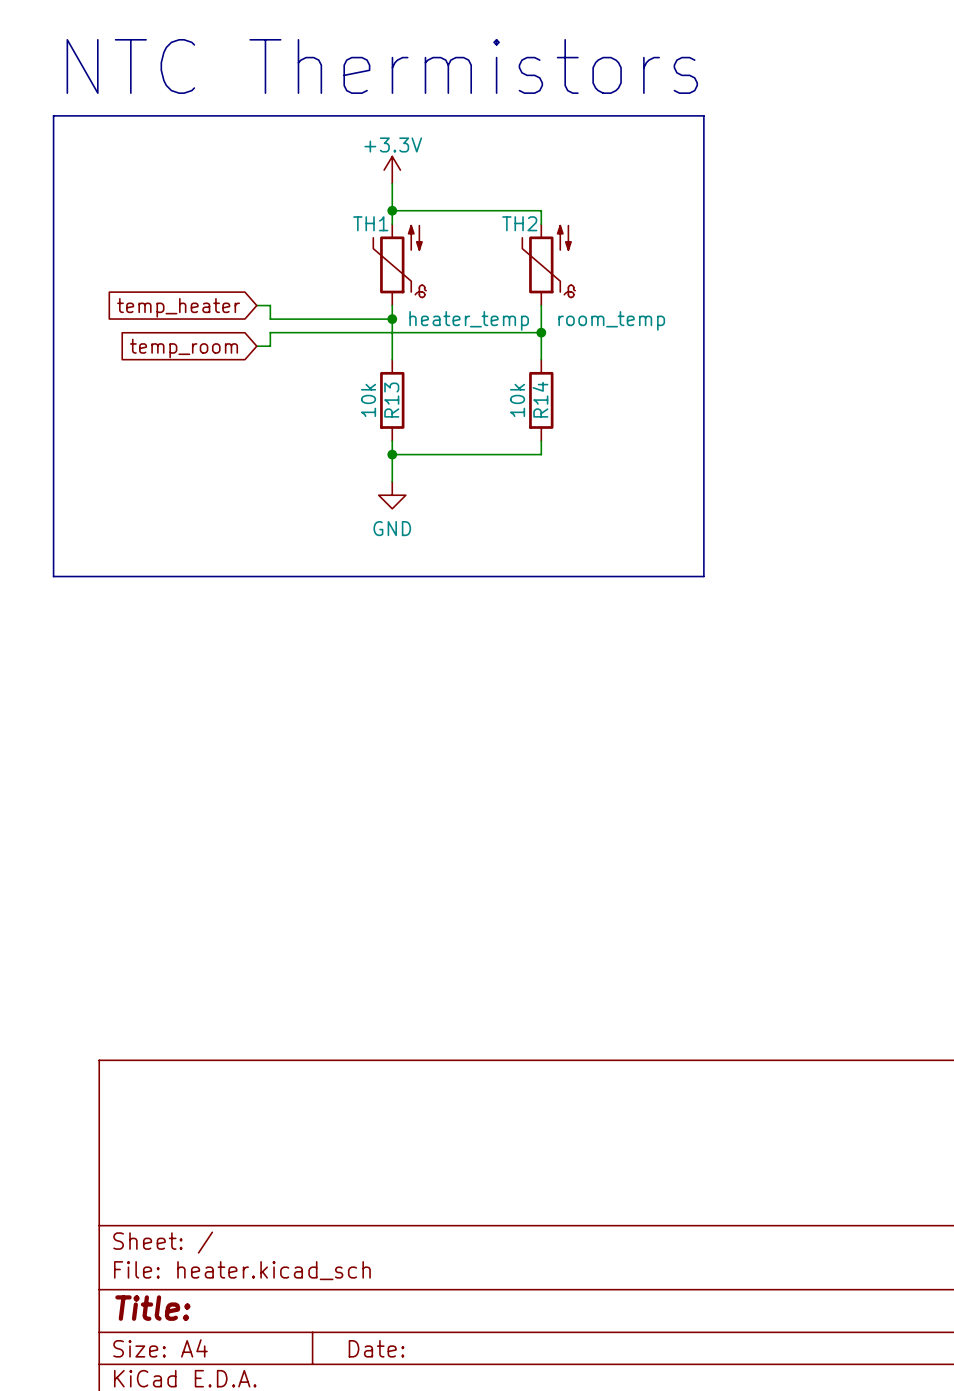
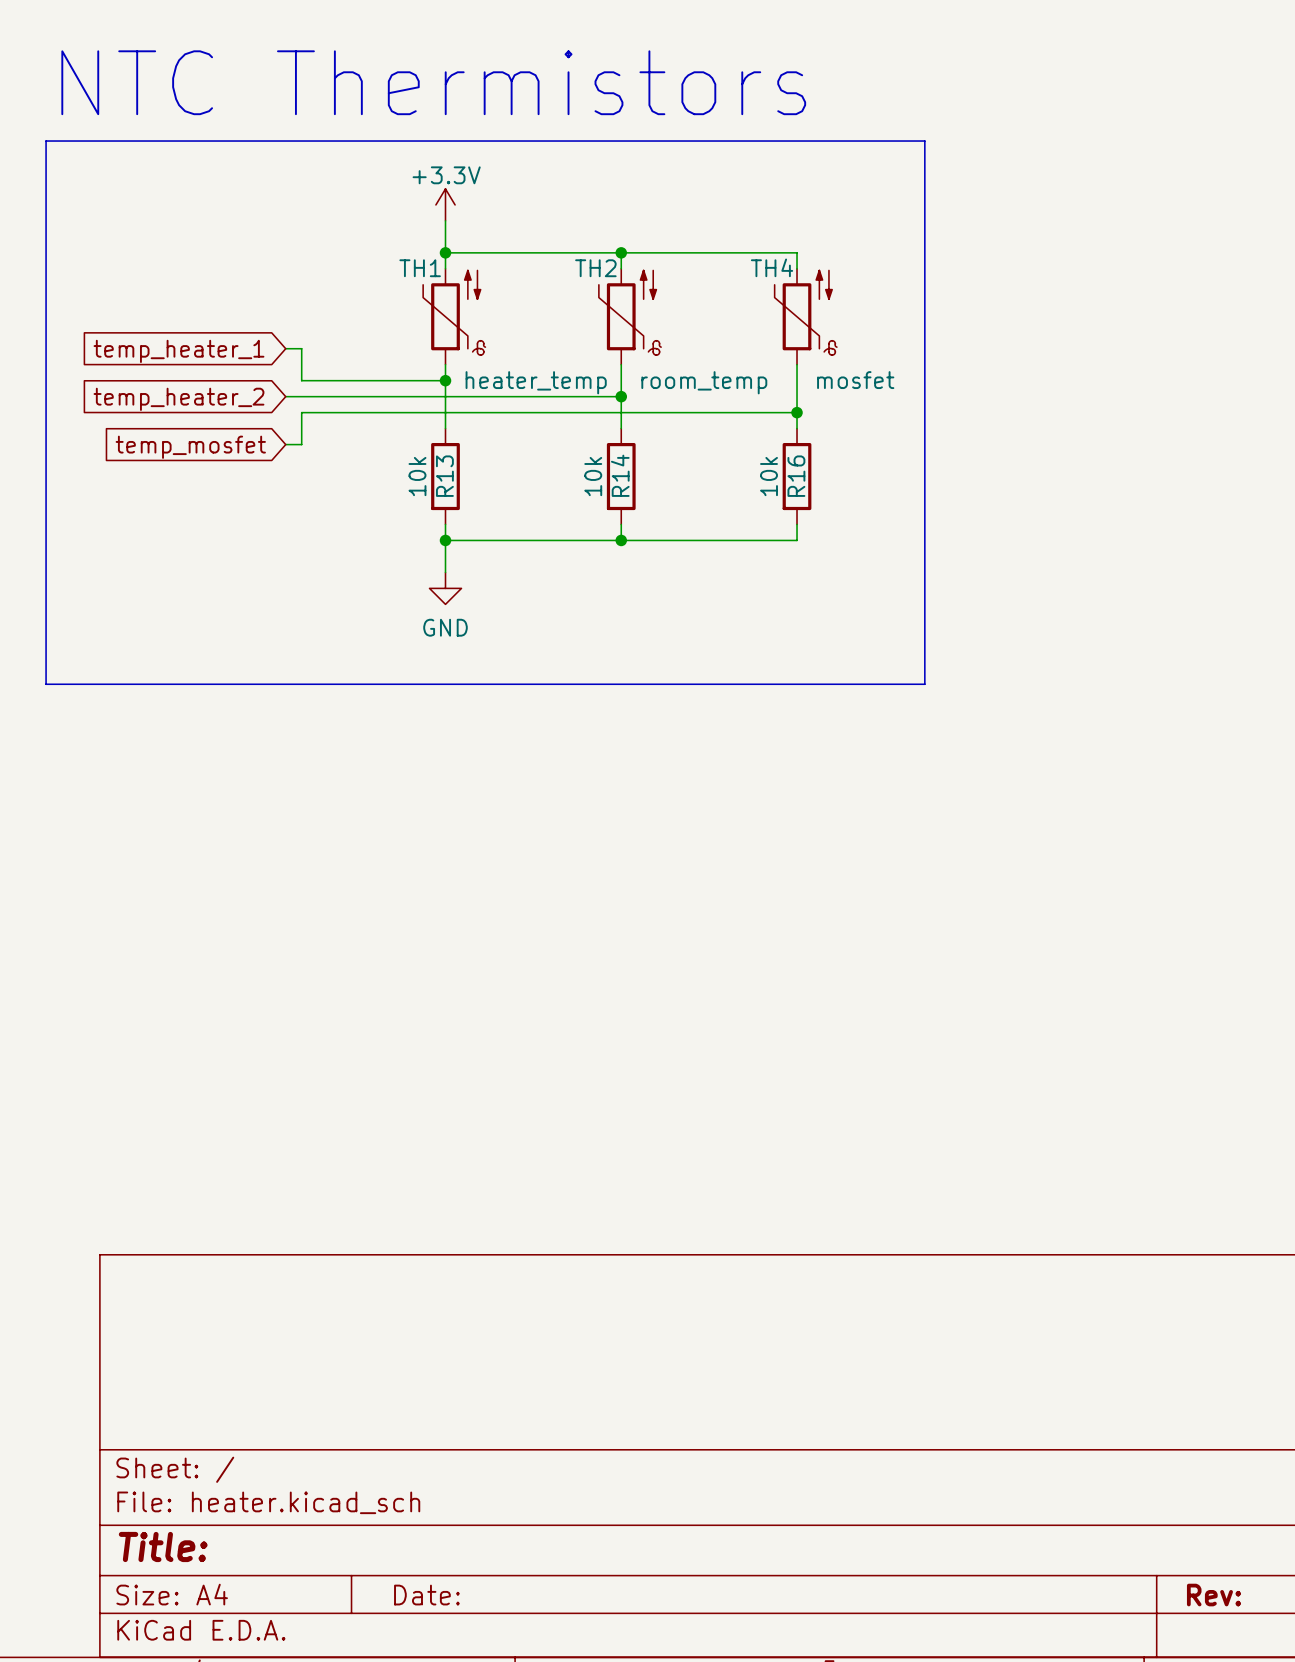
line: (703, 115) (703, 576) -> (812, 141) (924, 141) (924, 684) (812, 684)
wire: none -> (621, 252) (797, 252) (797, 268)
junction: none -> (621, 252)
TH4: none -> mosfet (805, 316)
global label: none -> temp_heater_1 (178, 351)
wire: (256, 305) (270, 305) -> (285, 348) (301, 348) (301, 364)
wire: none -> (797, 364) (797, 428)
global label: temp_heater (178, 307) -> none
wire: (270, 332) (270, 346) (256, 346) -> (301, 396) (285, 396)
global label: none -> temp_heater_2 (178, 399)
wire: none -> (797, 412) (301, 412) (301, 444) (285, 444)
junction: none -> (797, 412)
global label: temp_room (184, 348) -> none
global label: none -> temp_mosfet (190, 447)
R16: none -> 10k (797, 476)
wire: none -> (797, 524) (797, 540) (621, 540)
junction: none -> (621, 540)

